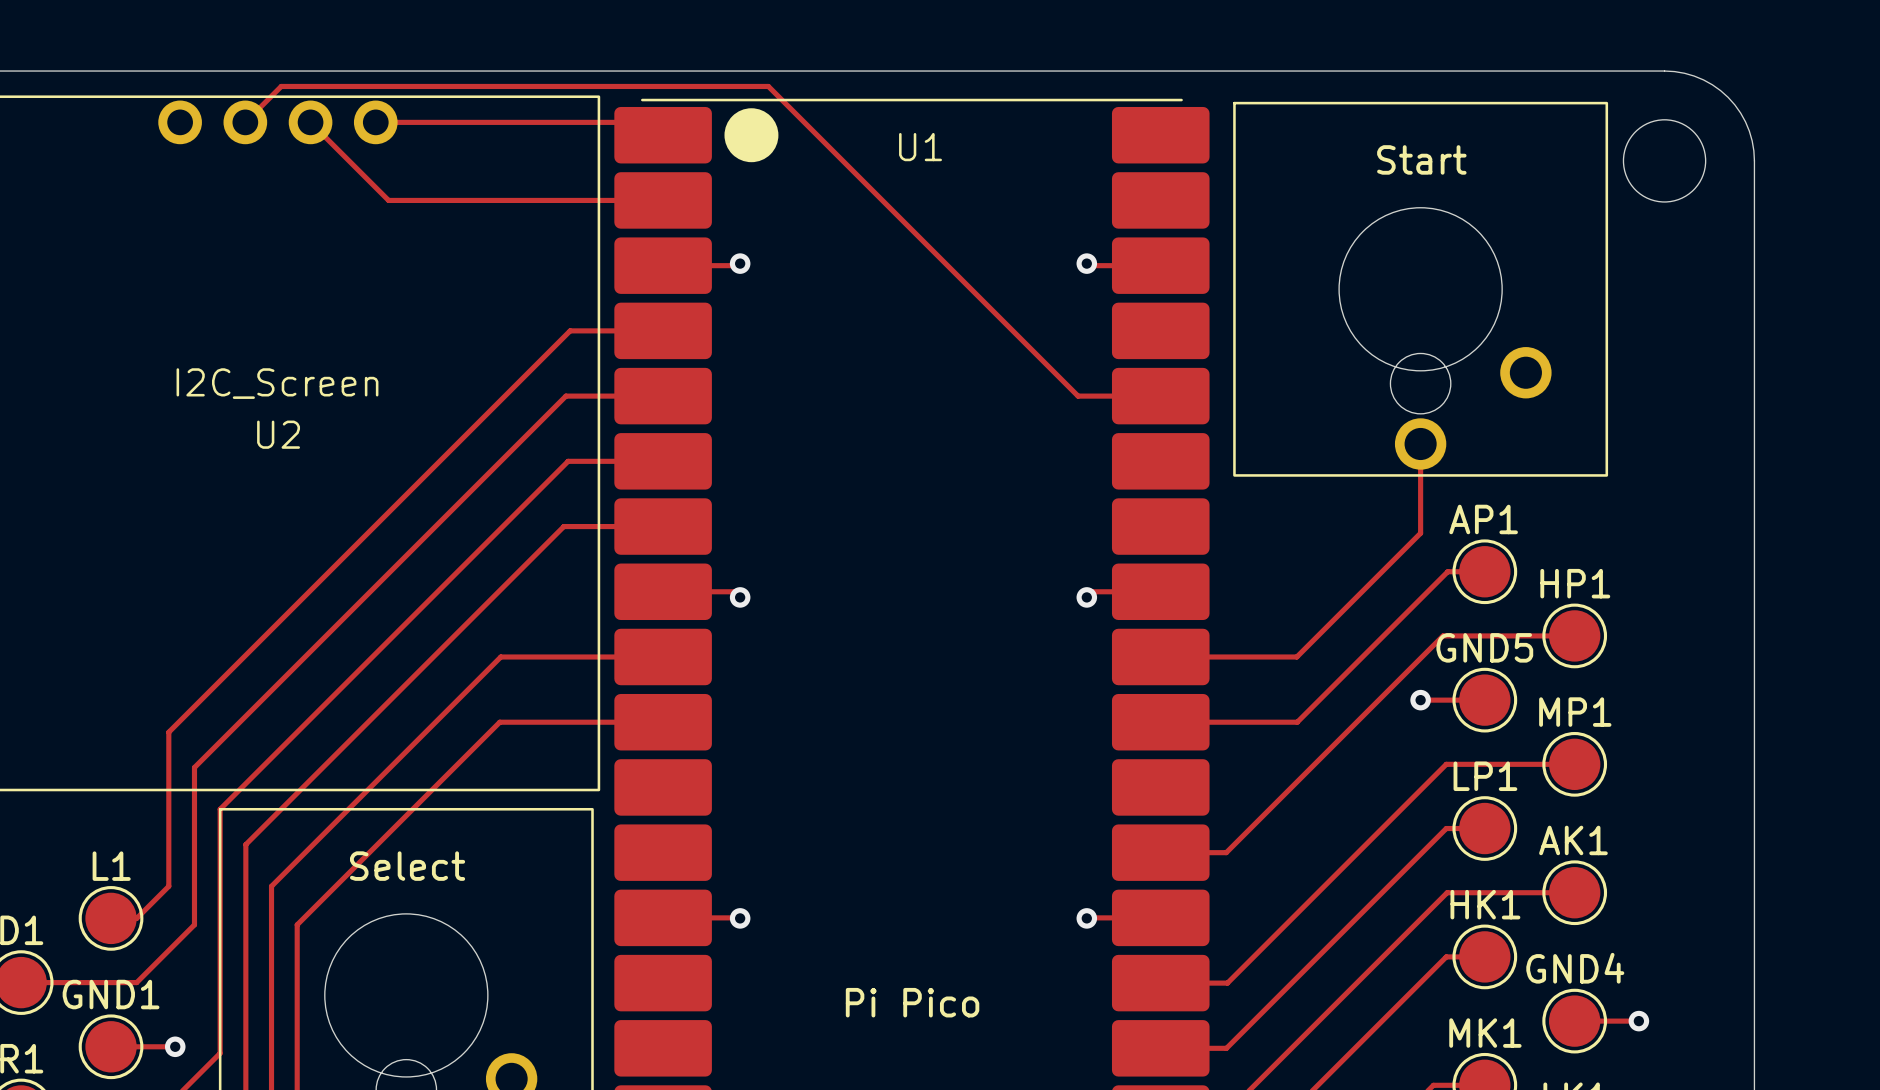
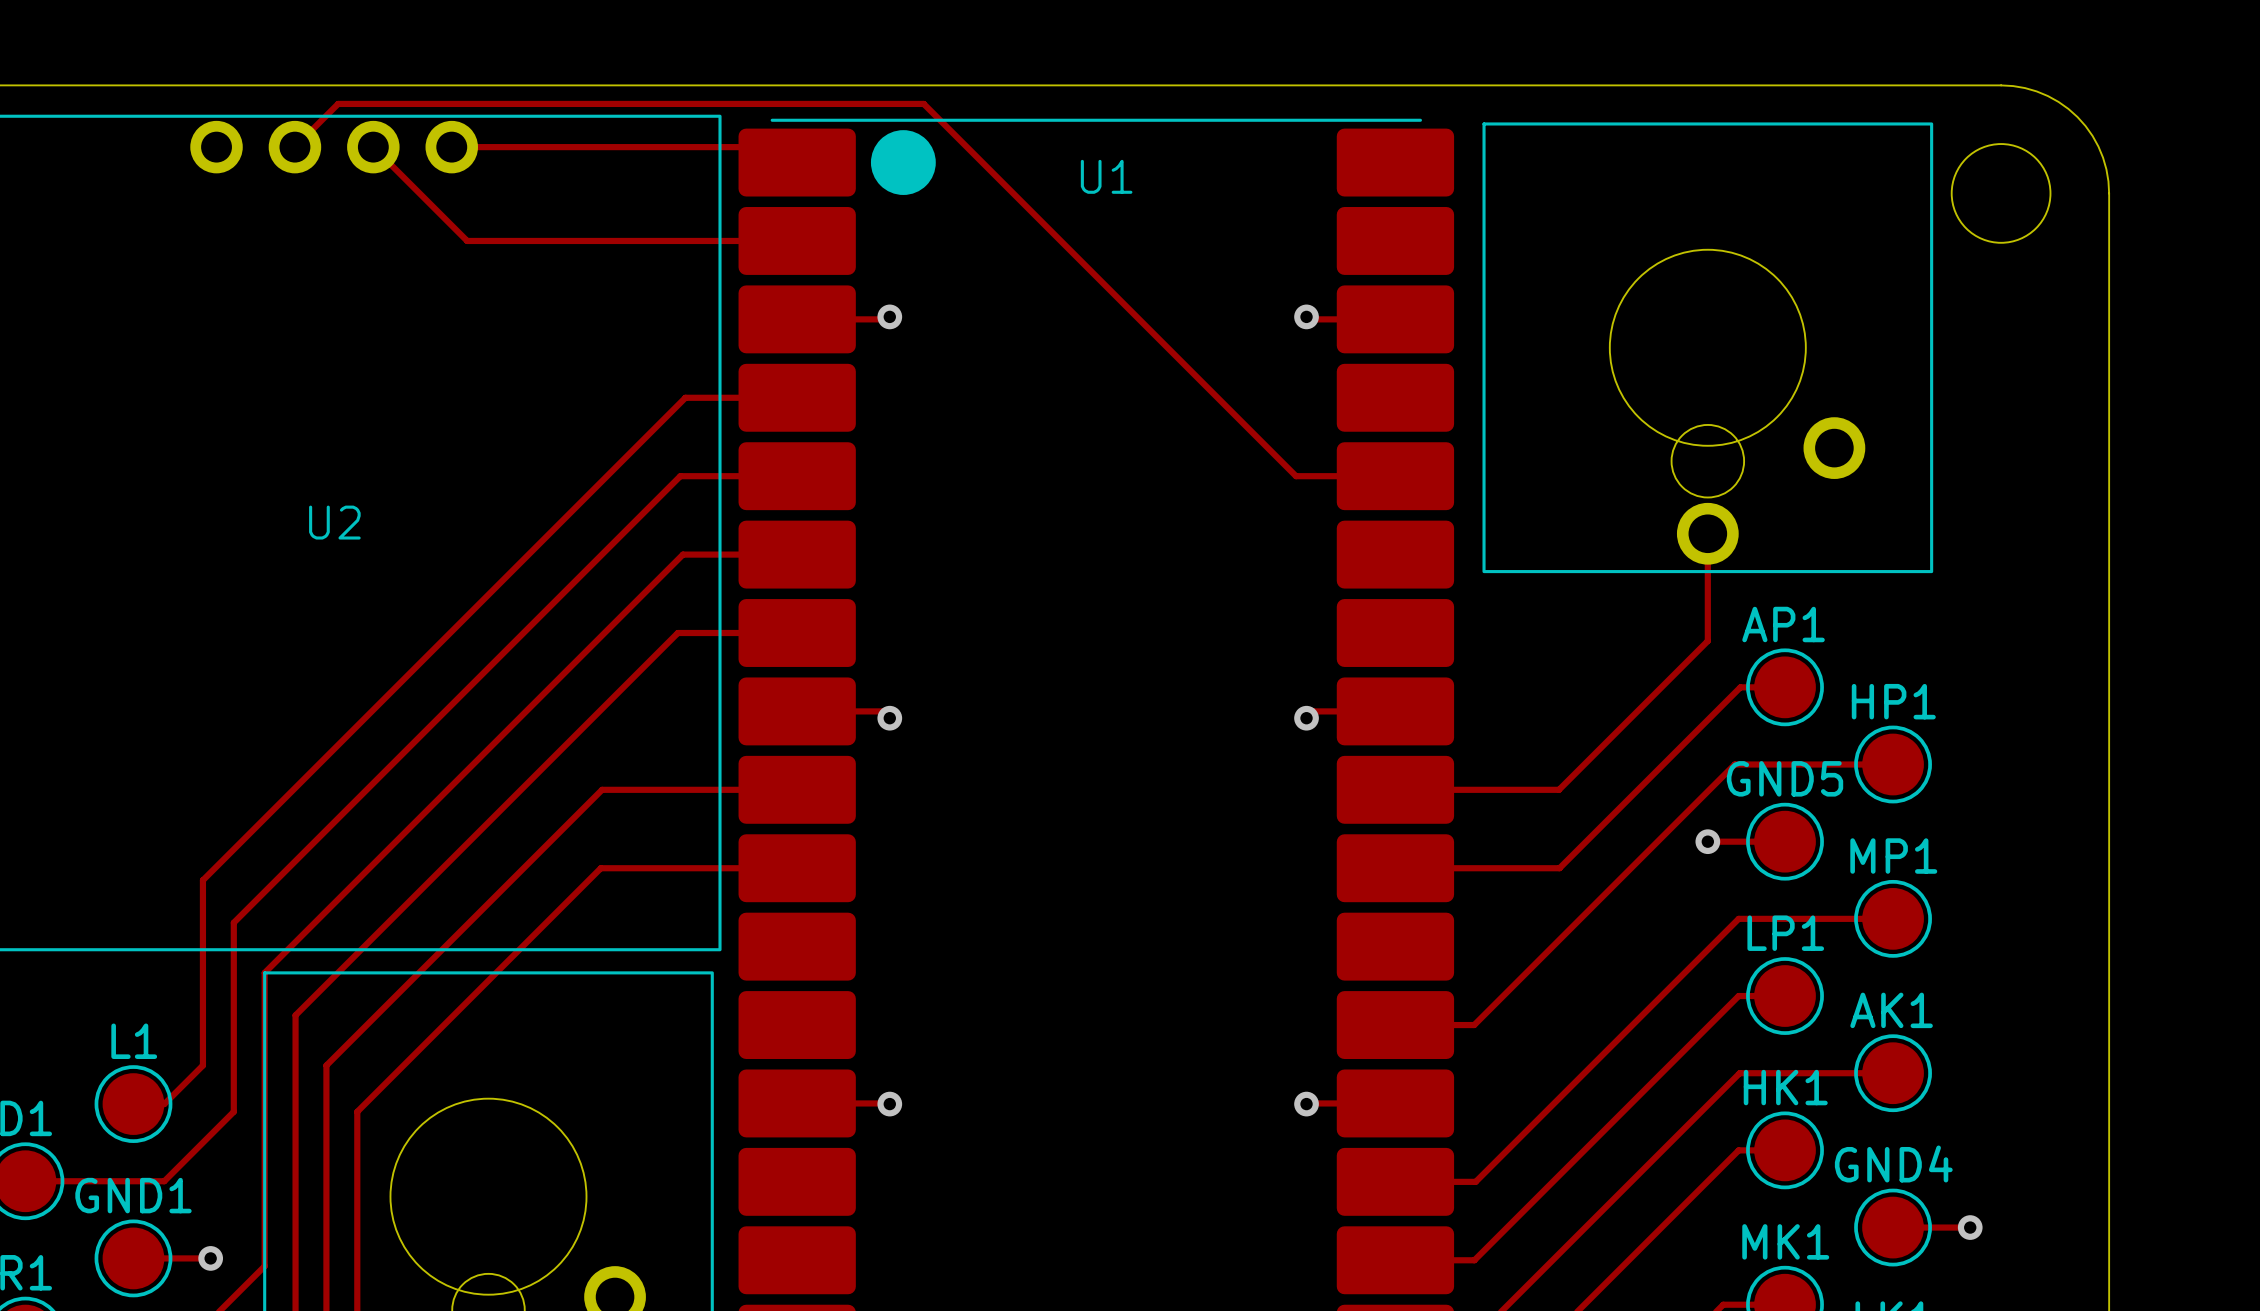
part value: Start (1421, 159) -> none
text: I2C_Screen (277, 383) -> none
part value: Select (407, 866) -> none
U1 value: Pi Pico (912, 1002) -> none

